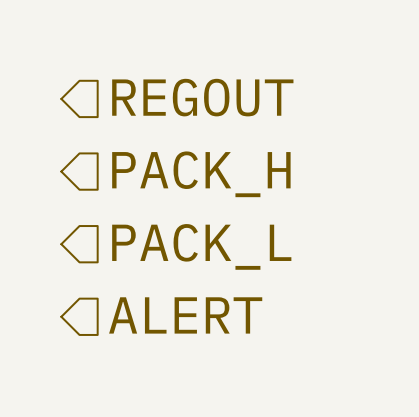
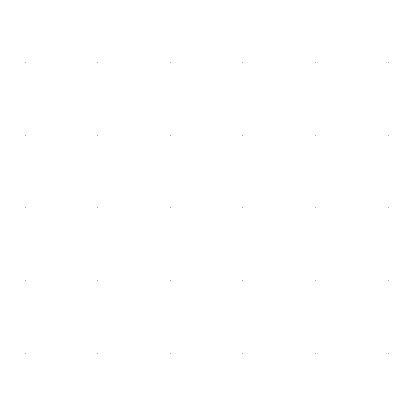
hierarchical label: REGOUT (202, 97) -> none
hierarchical label: PACK_H (201, 174) -> none
hierarchical label: PACK_L (201, 246) -> none
hierarchical label: ALERT (185, 315) -> none

